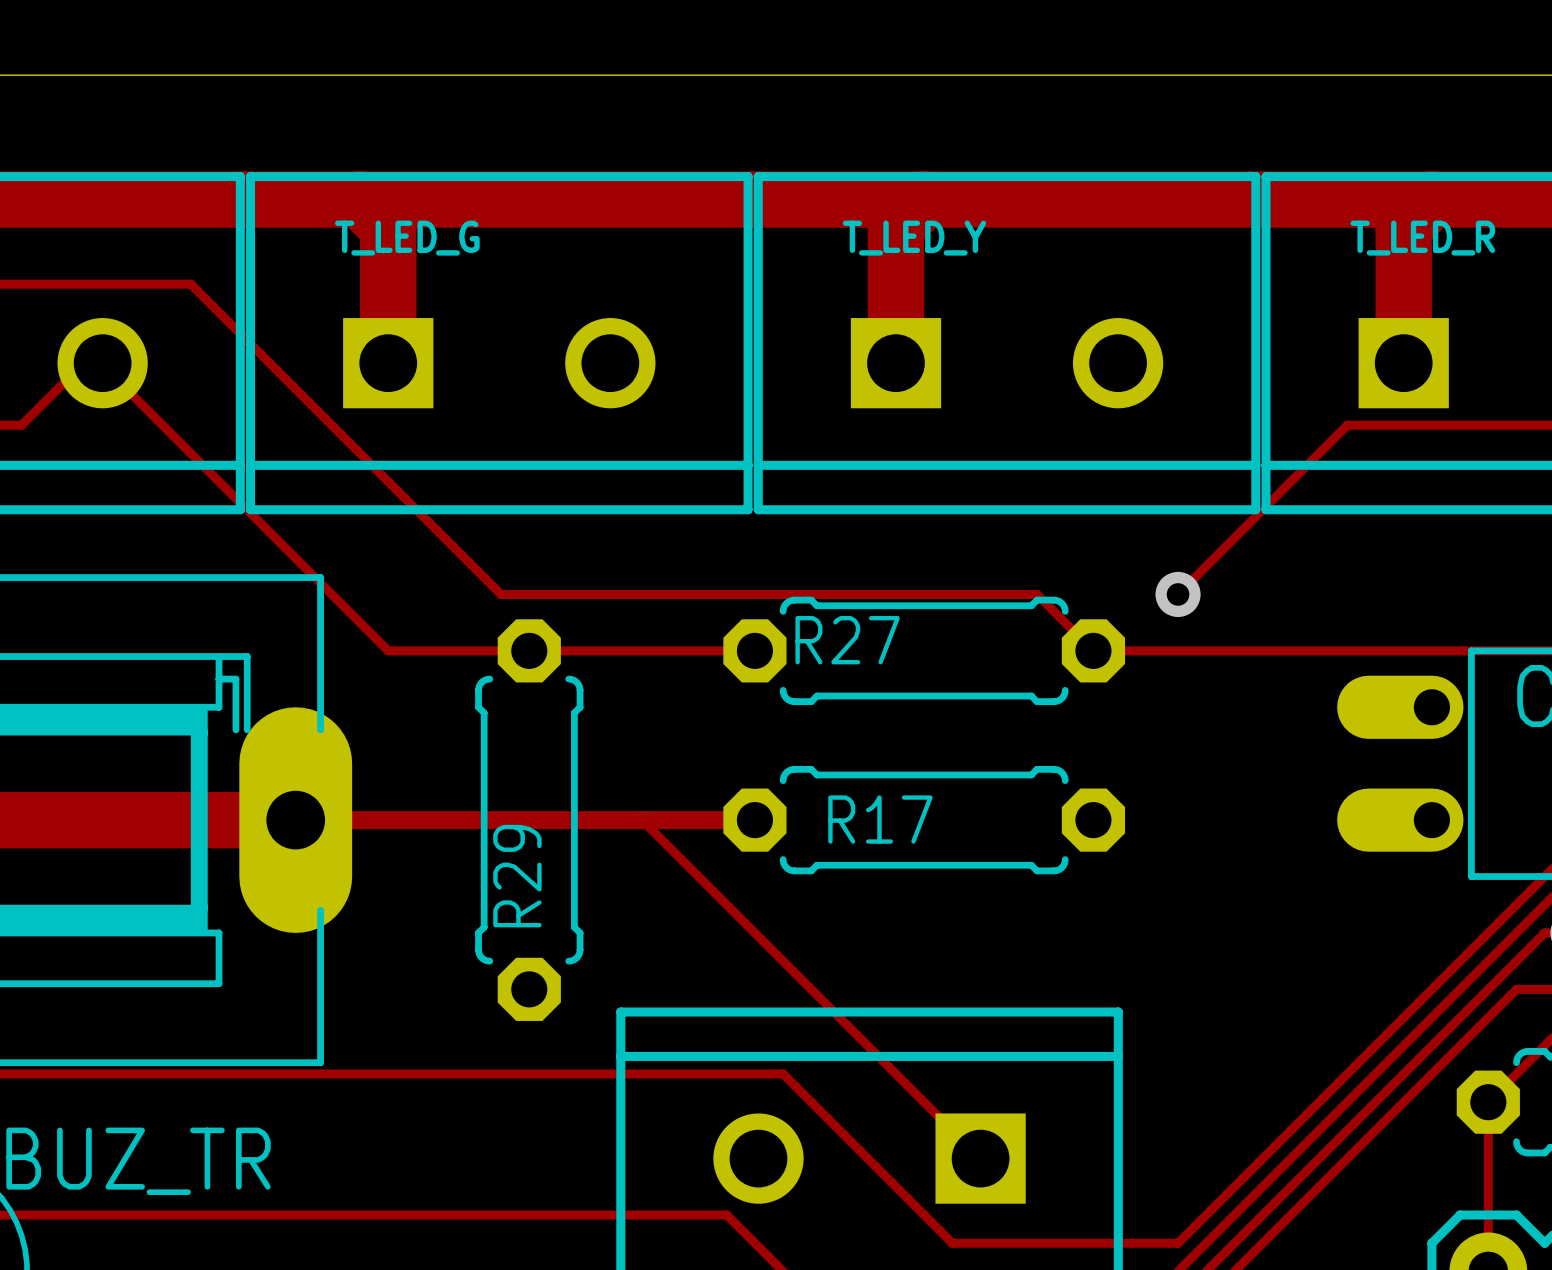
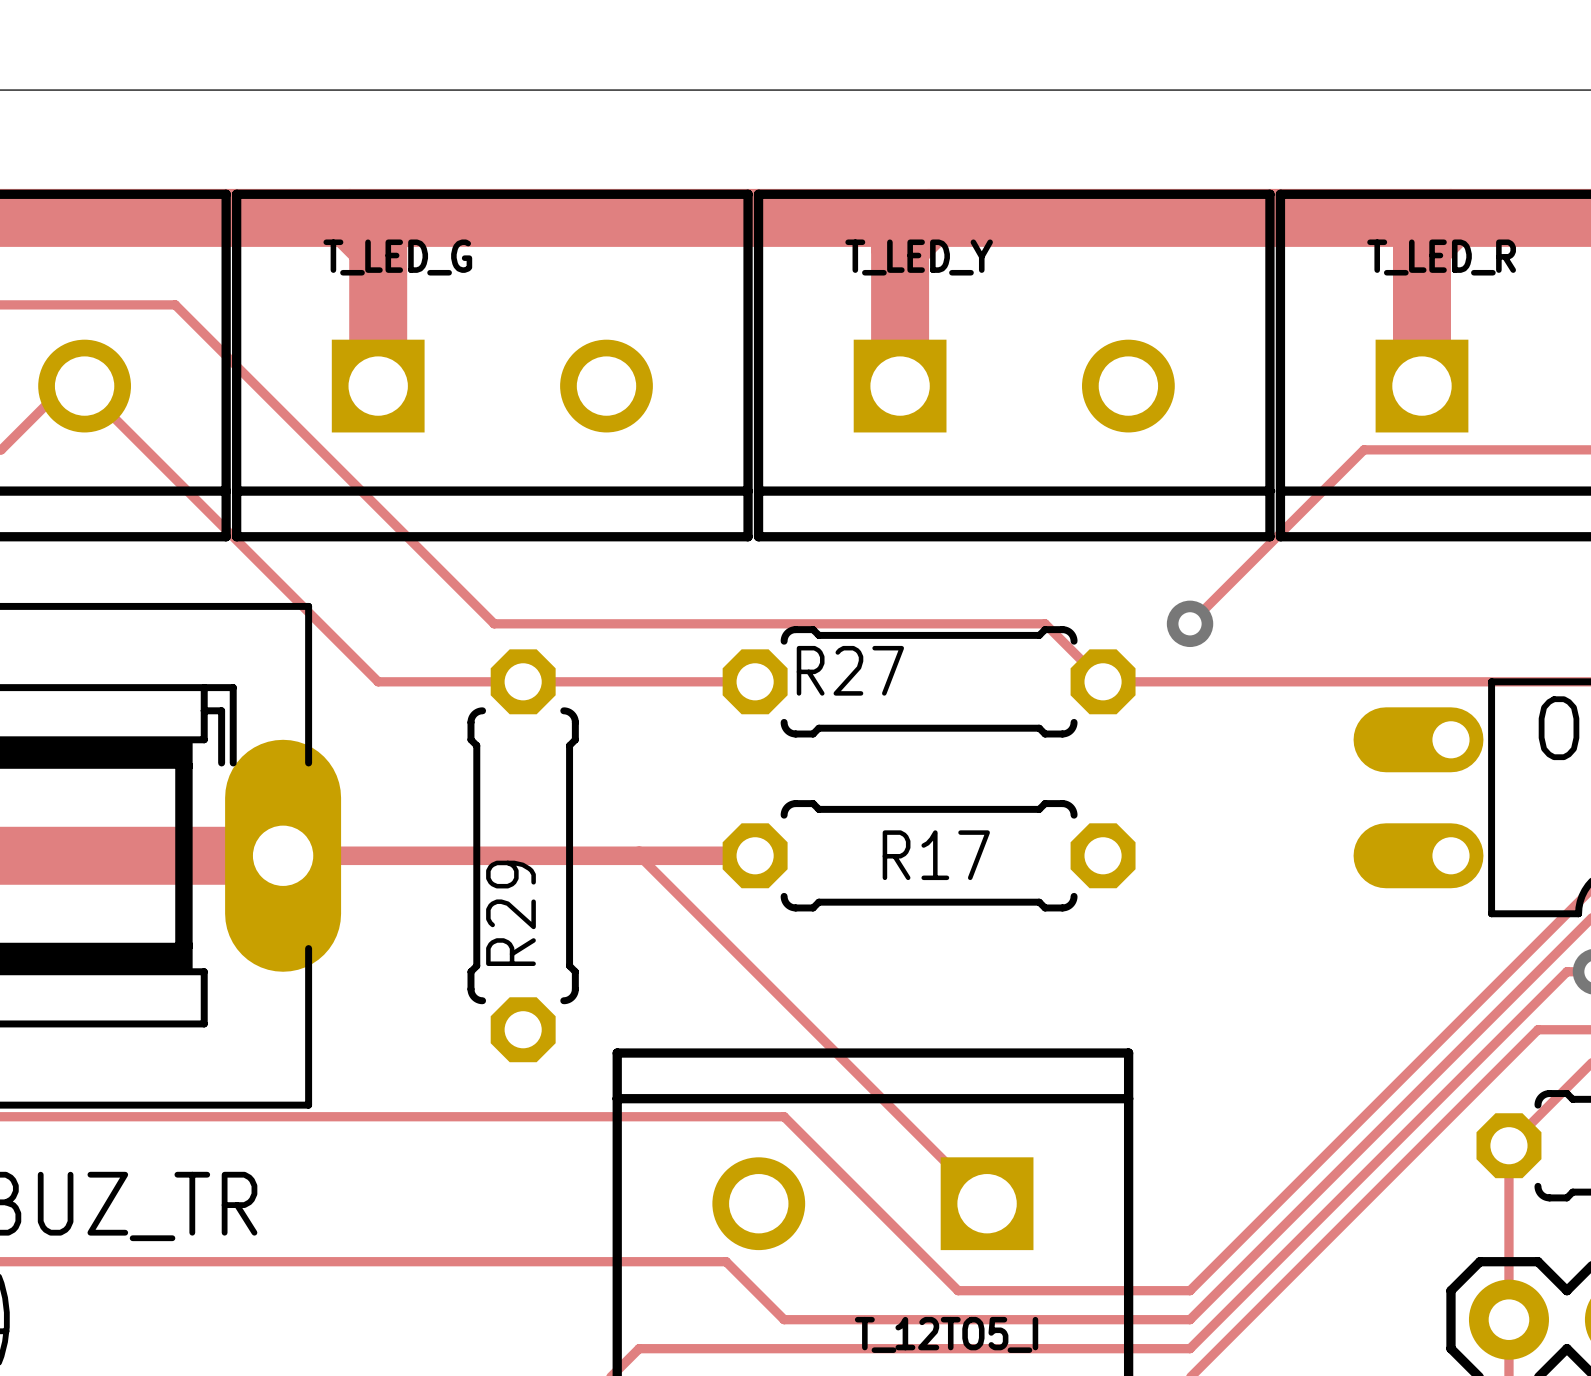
R17 name position: R17 (880, 819) -> R17 (936, 855)

